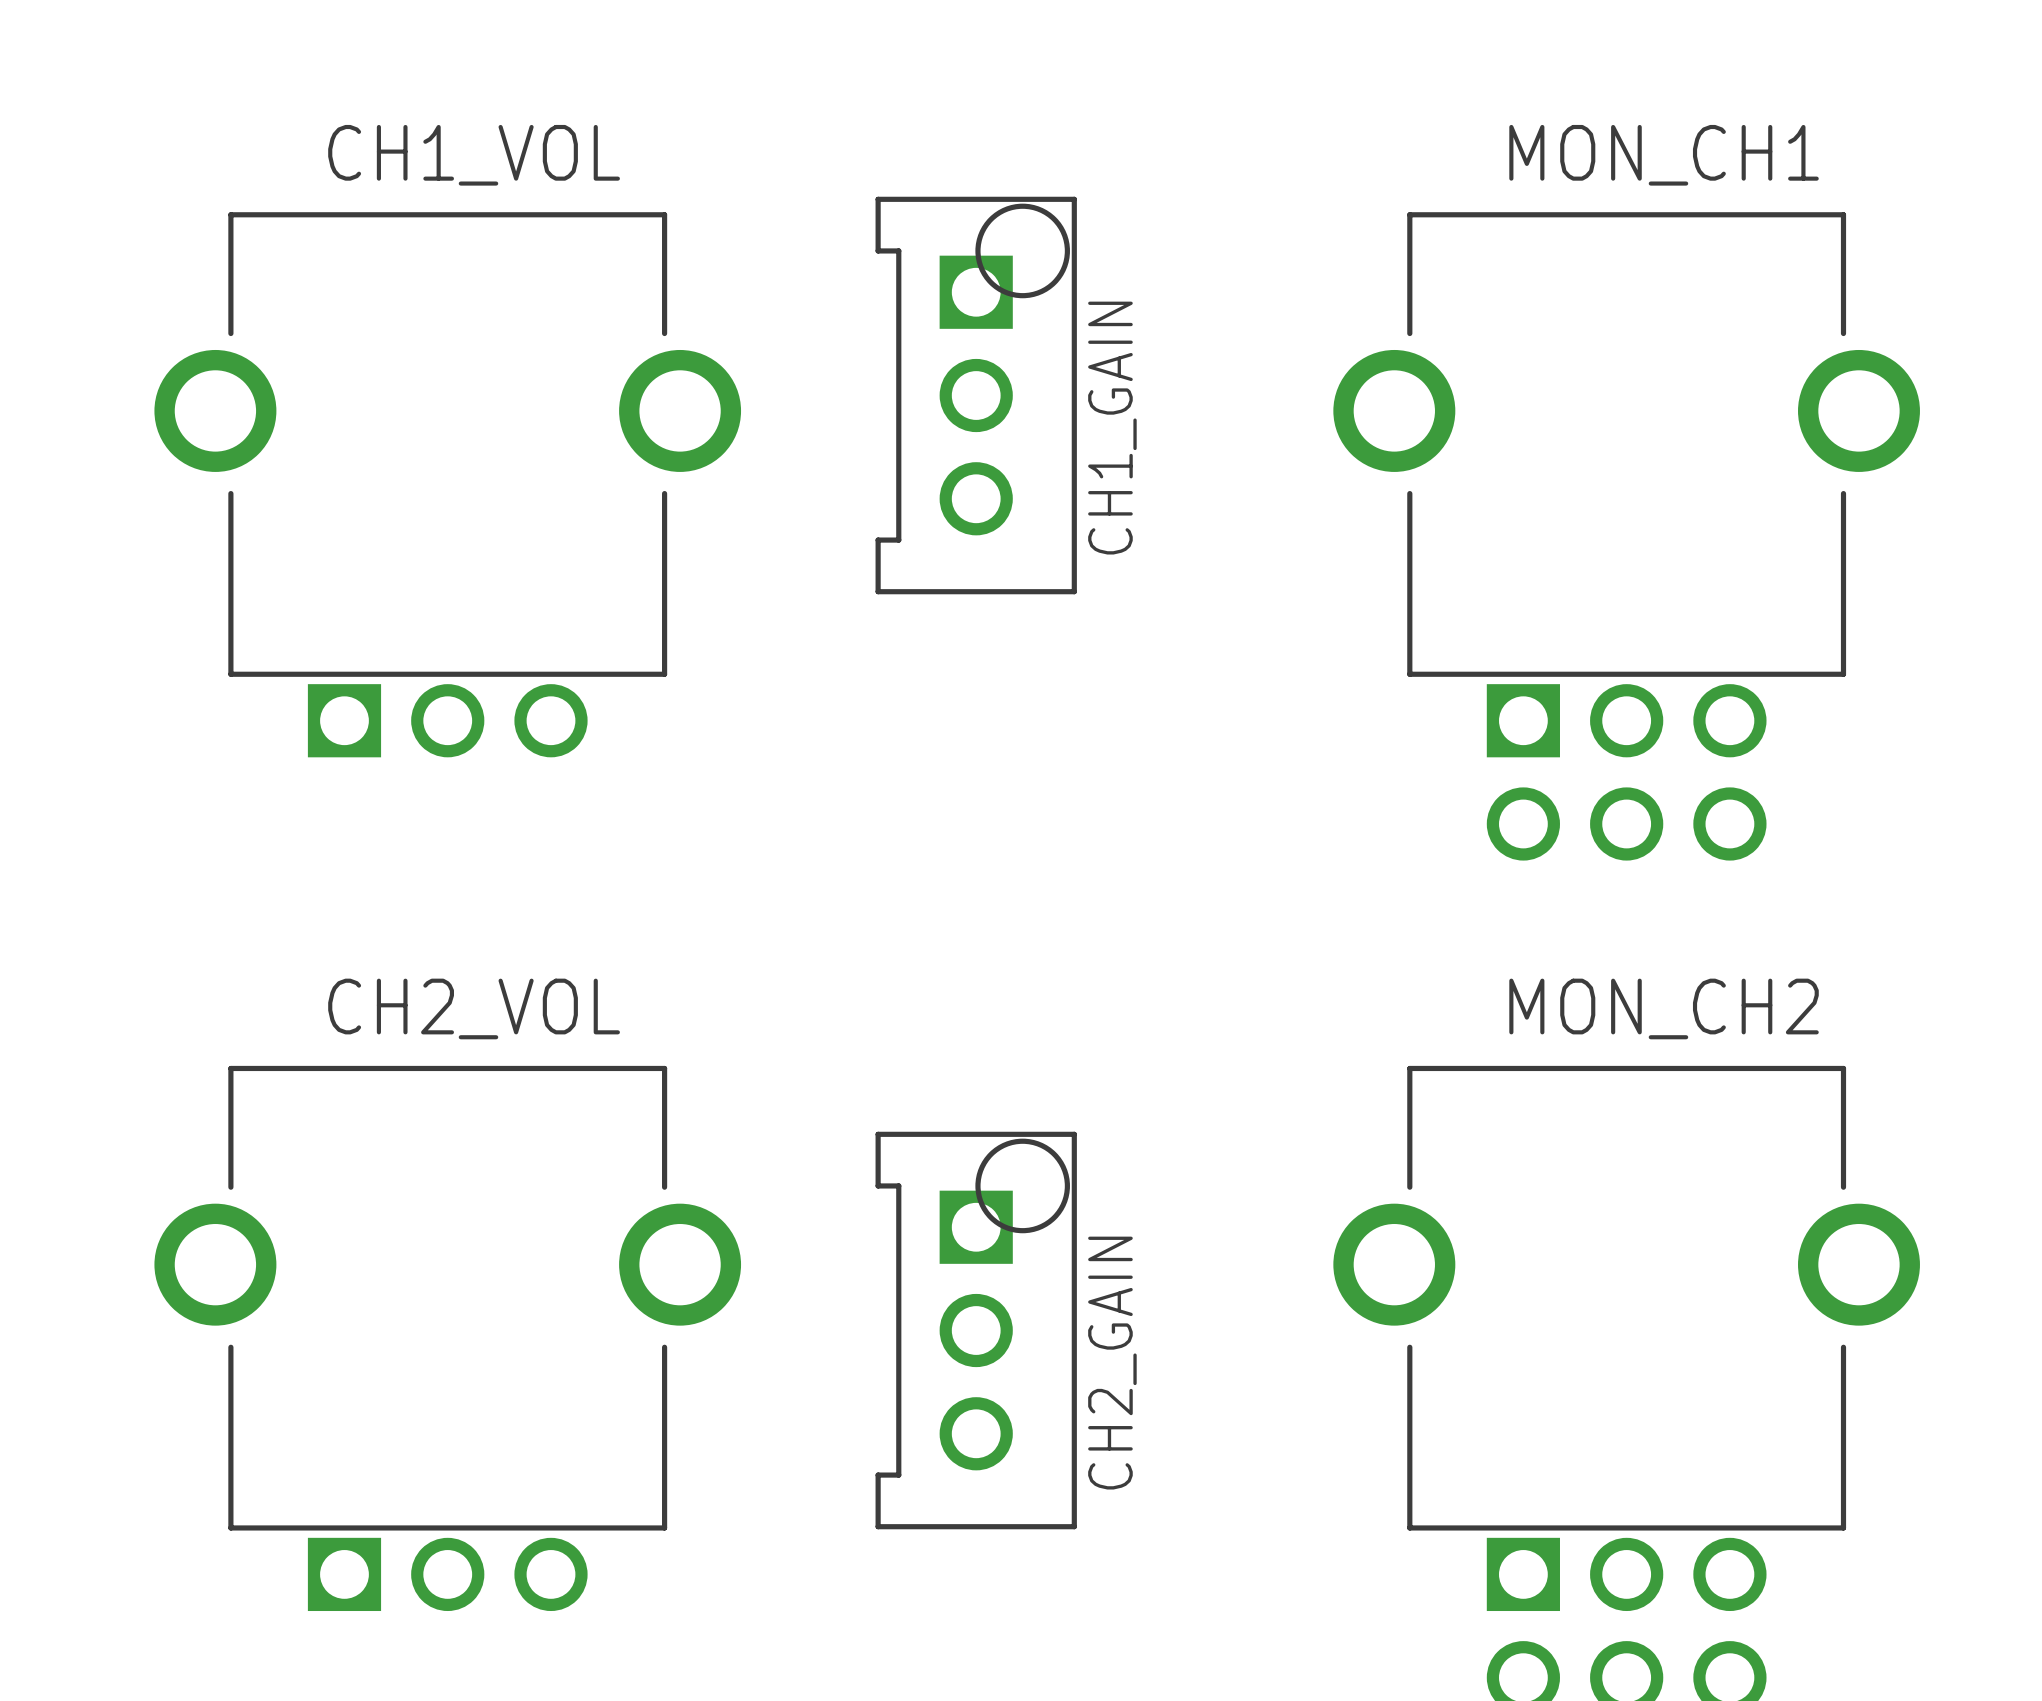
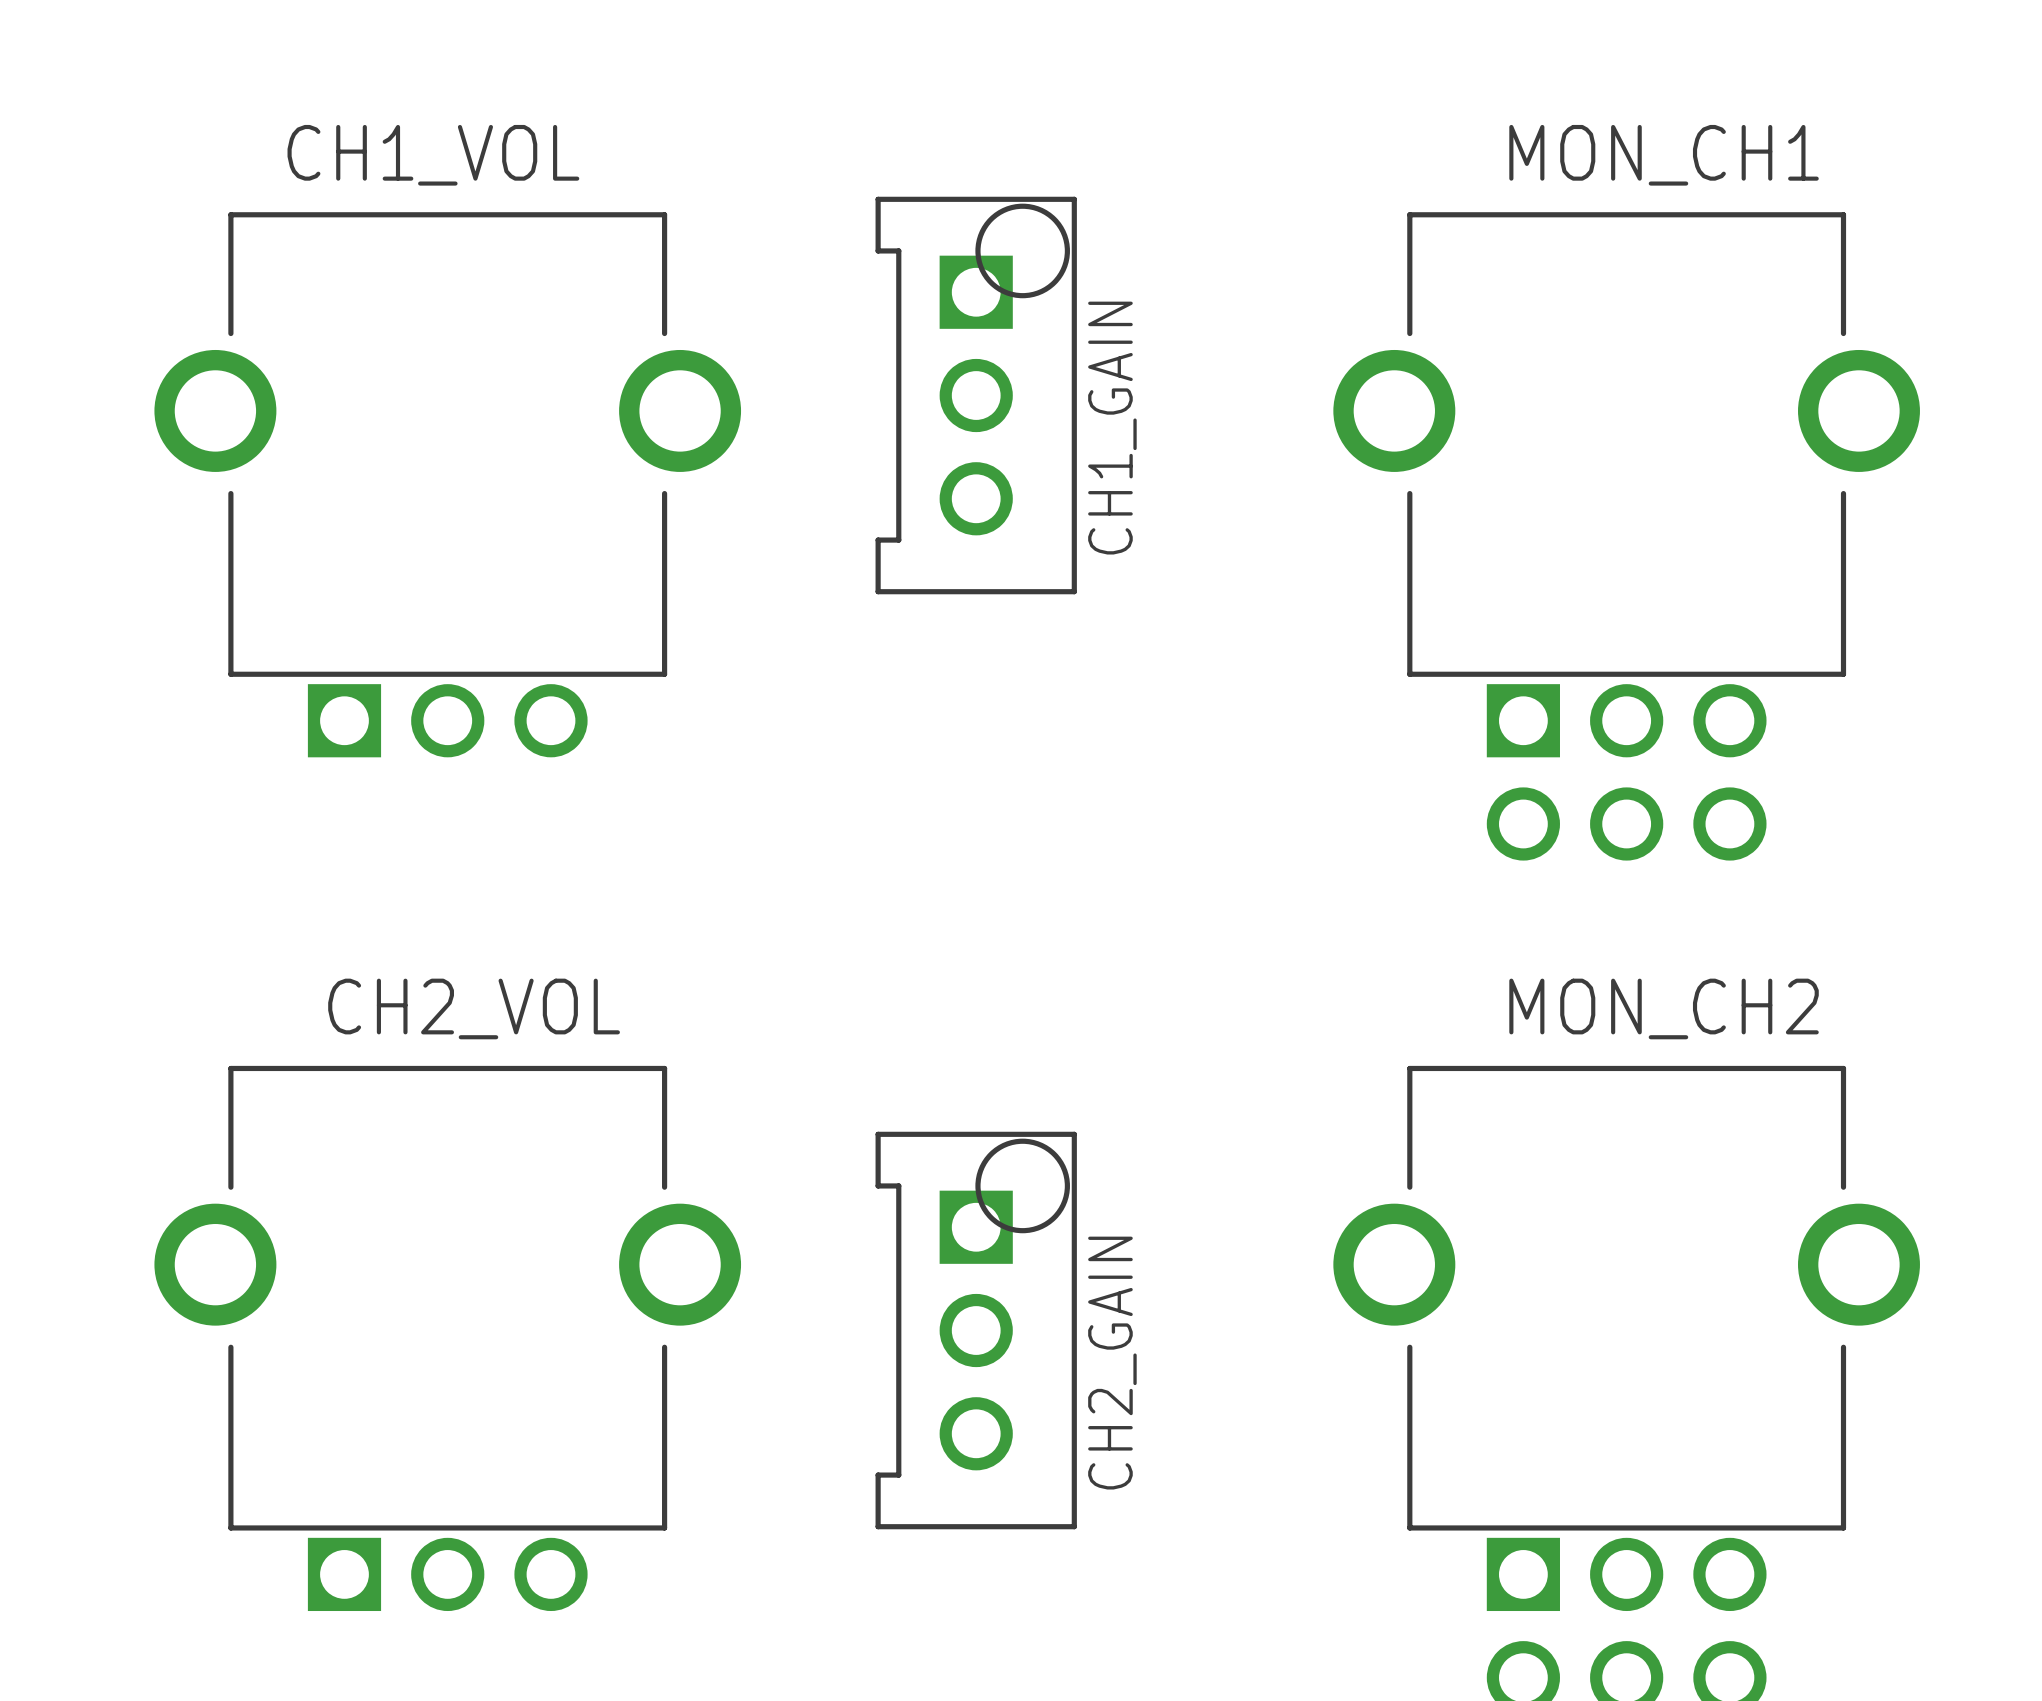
CH1_VOL name position: CH1_VOL (474, 155) -> CH1_VOL (433, 155)

